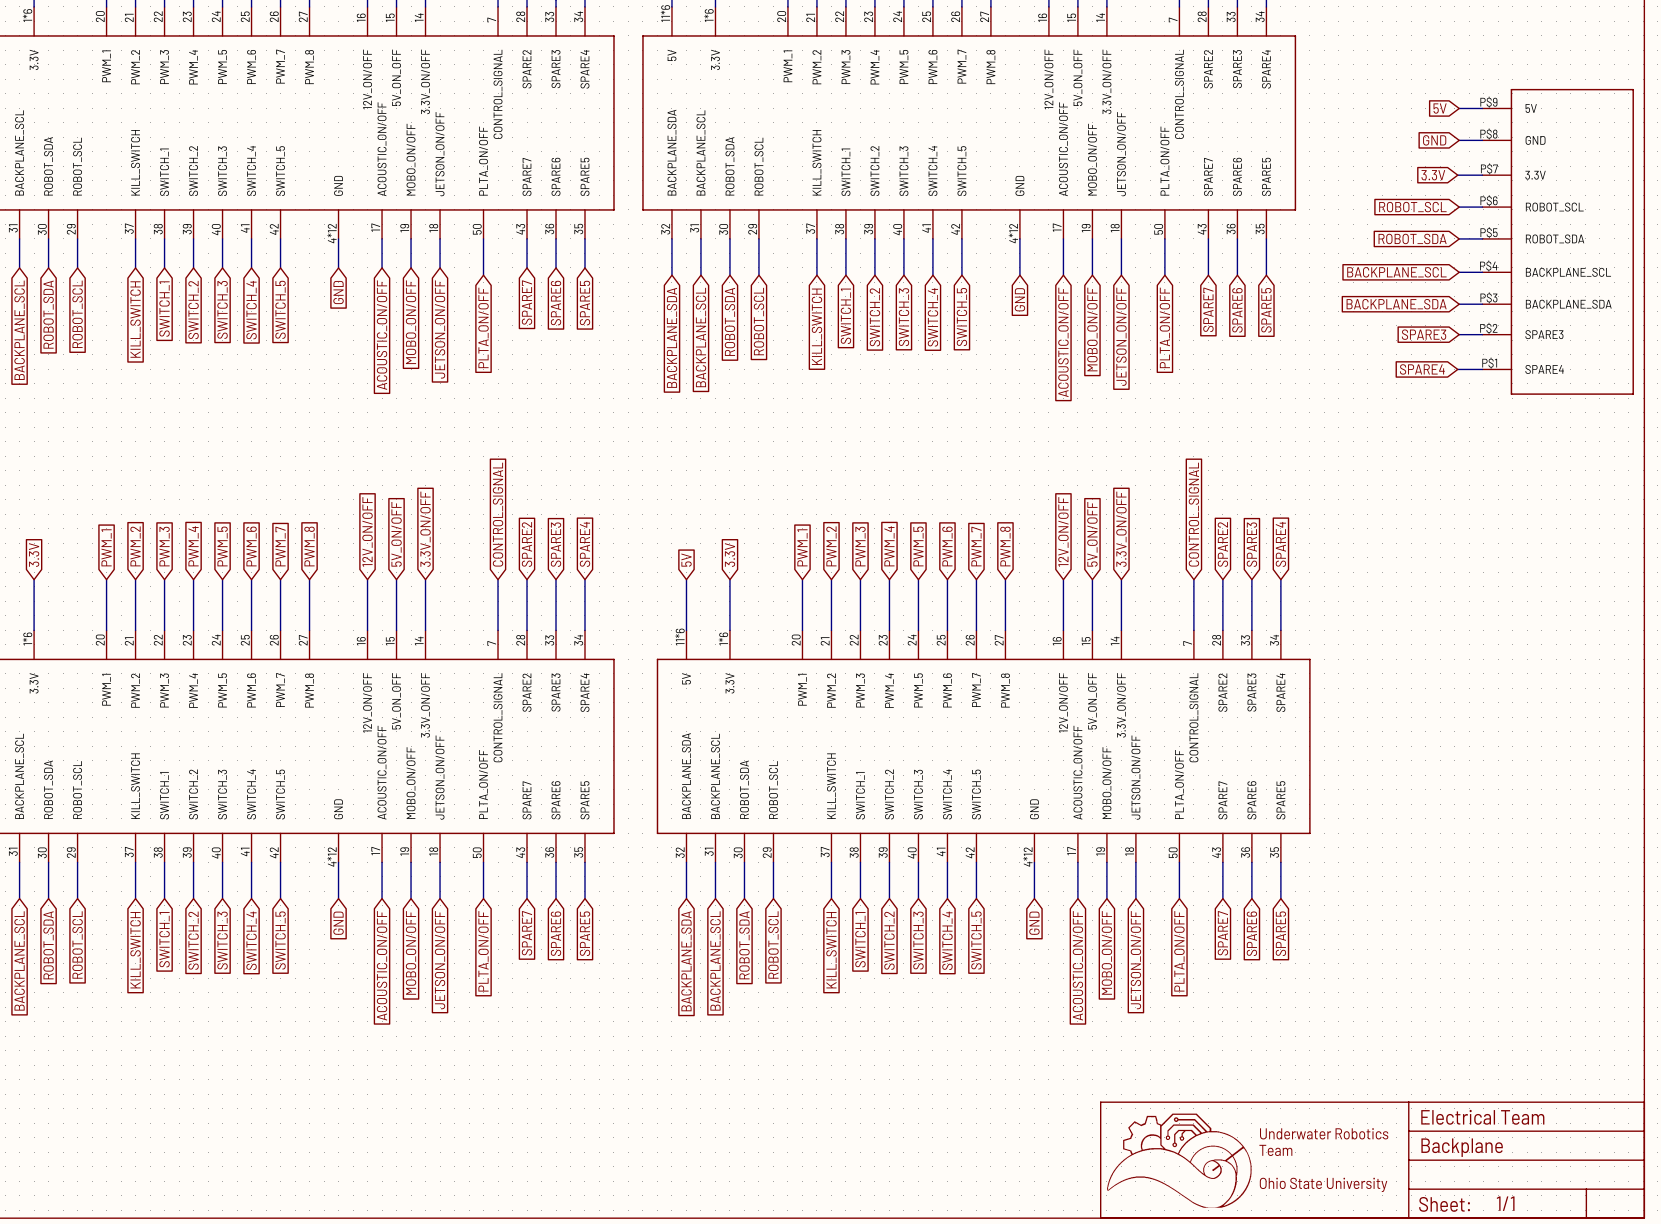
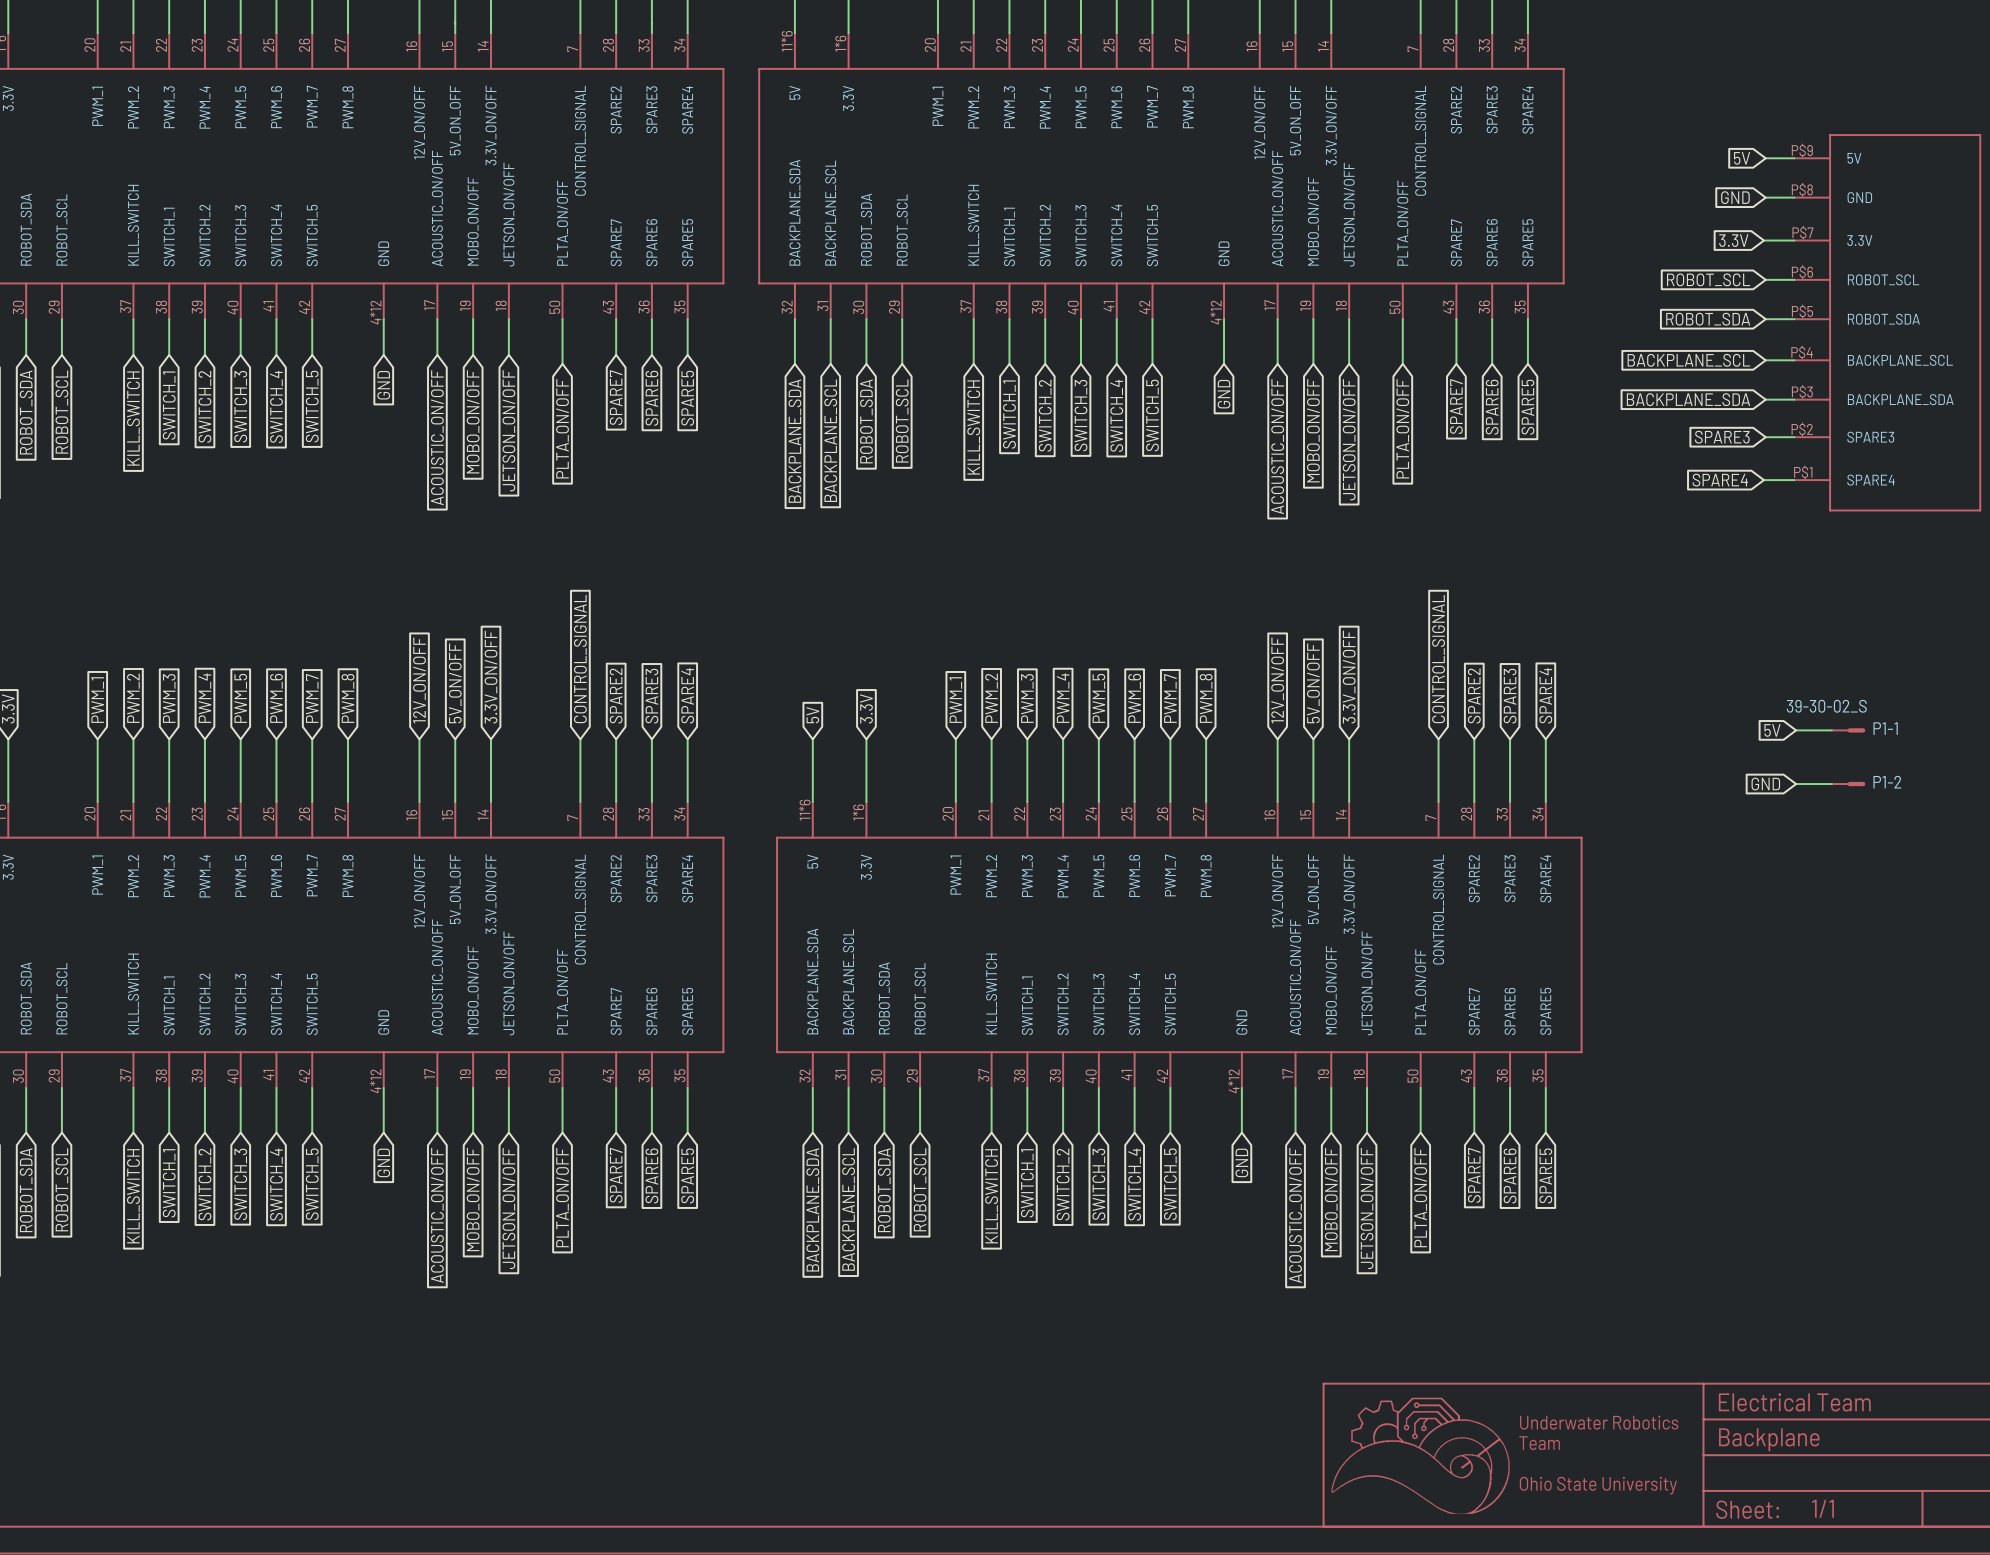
global label: none -> 5V (1772, 730)
wire: none -> (1796, 730) (1831, 730)
P1-1: none -> 39-30-02_S (1848, 730)
global label: none -> GND (1765, 784)
wire: none -> (1796, 784) (1831, 784)
P1-2: none -> (1848, 784)

